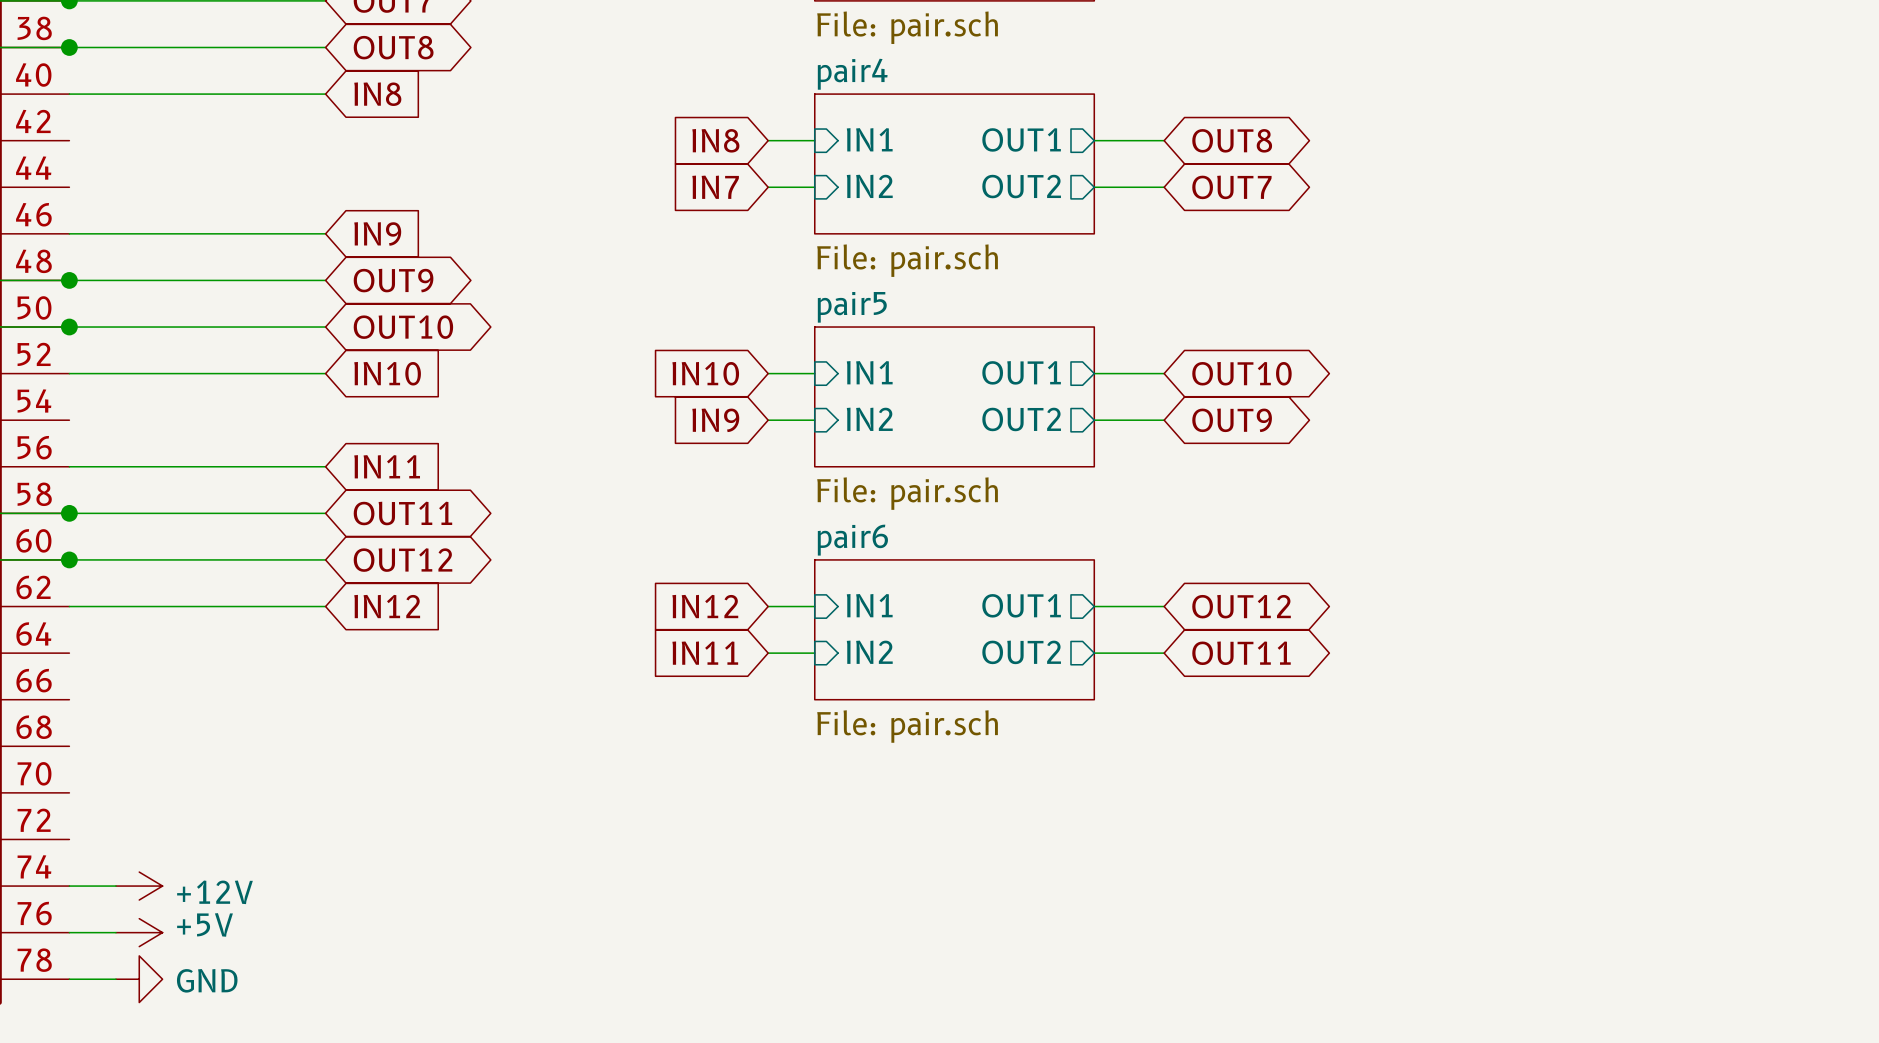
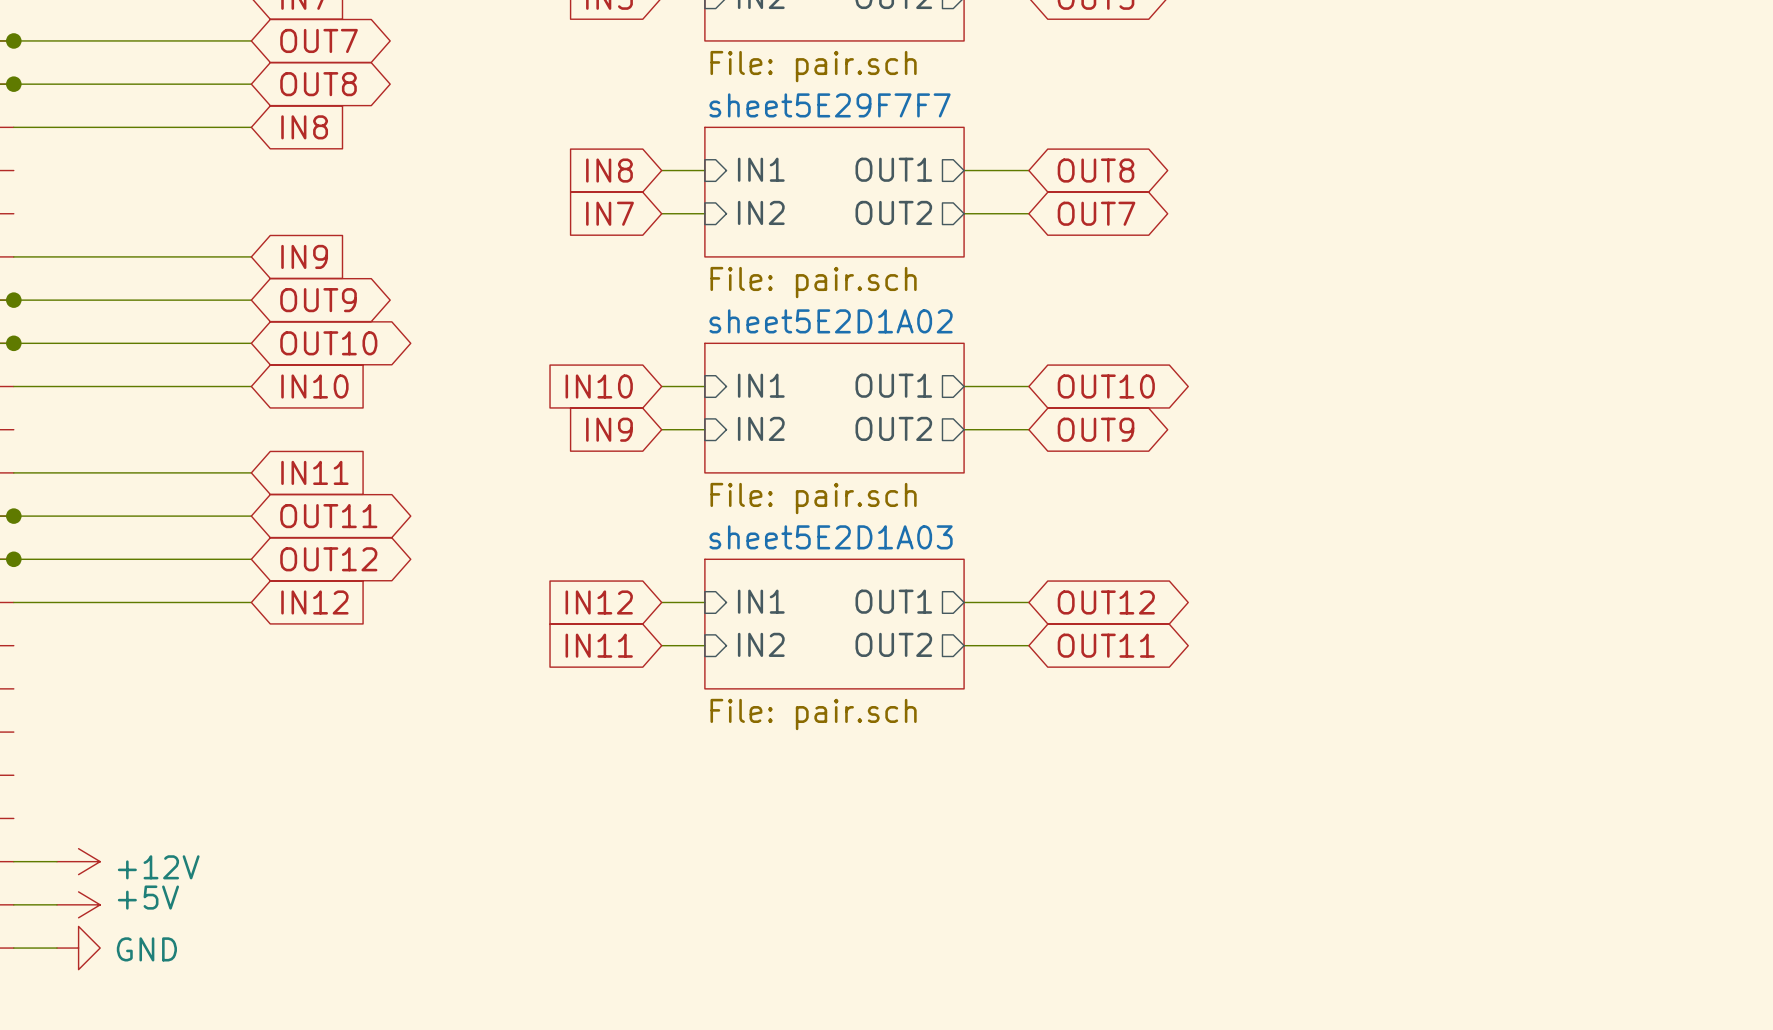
sheet pair4 name: pair4 (852, 74) -> sheet5E29F7F7 (830, 105)
sheet pair5 name: pair5 (852, 307) -> sheet5E2D1A02 (831, 321)
sheet pair6 name: pair6 (852, 540) -> sheet5E2D1A03 (831, 537)

